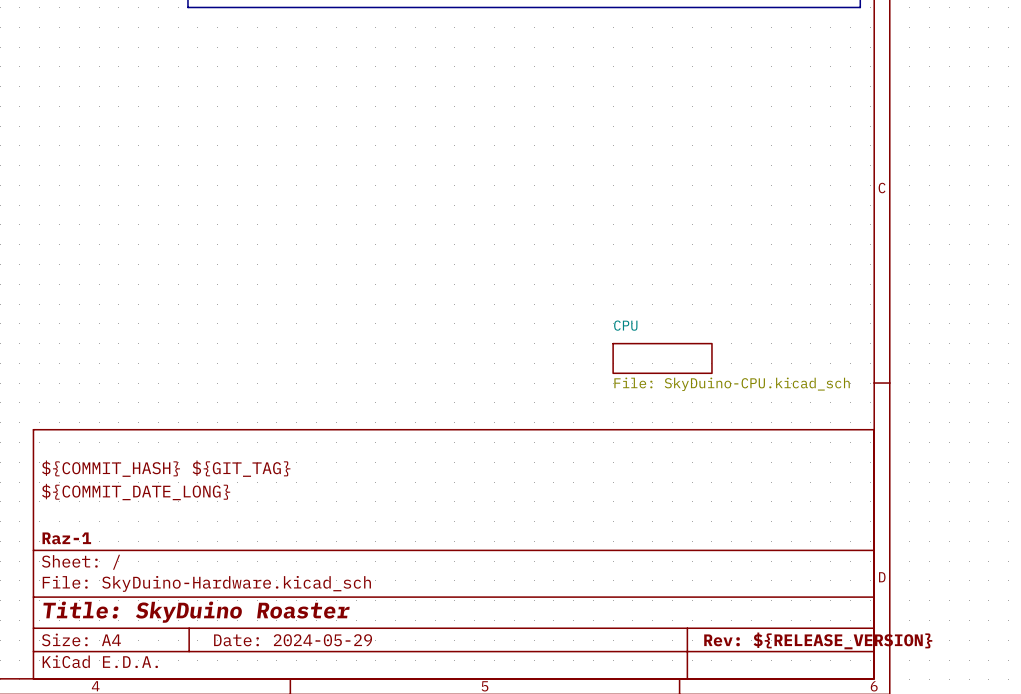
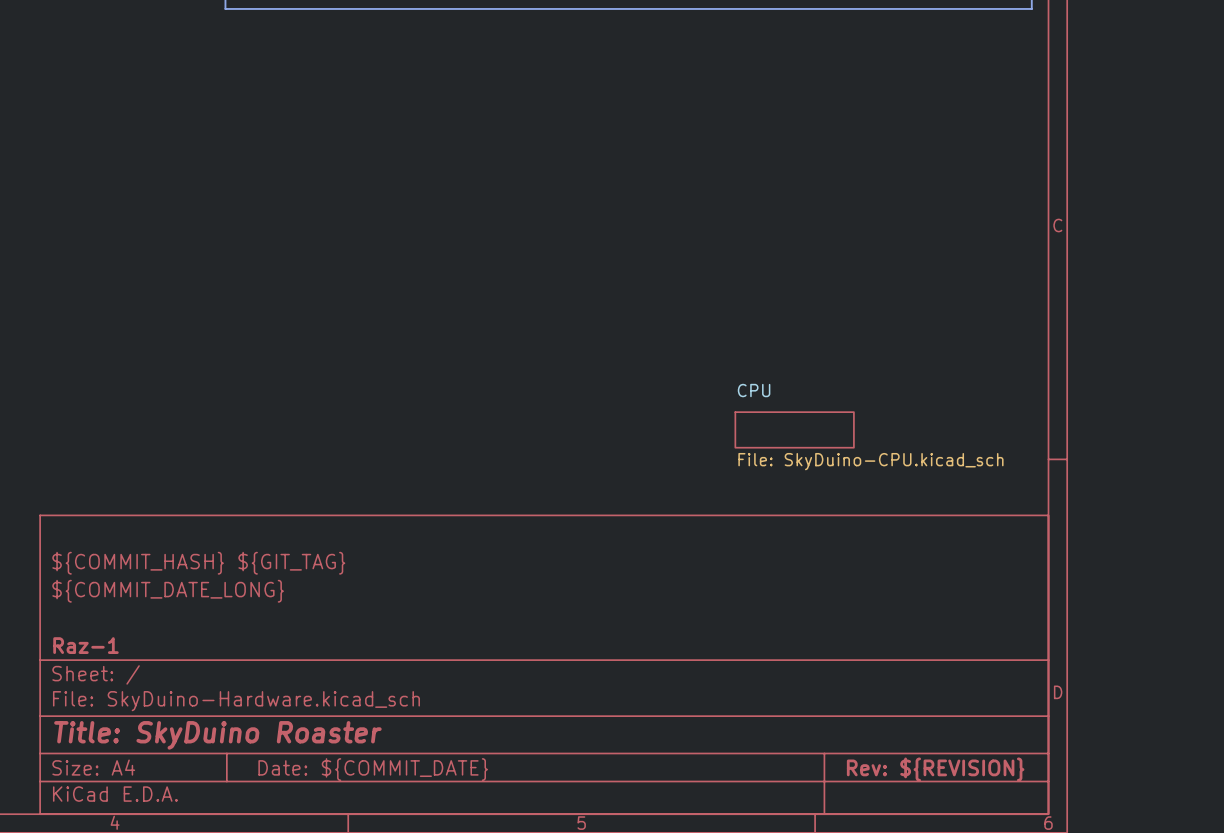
title block: Date: 2024-05-29 (293, 640) -> Date: ${COMMIT_DATE} (373, 769)
title block: Rev: ${RELEASE_VERSION} (818, 640) -> Rev: ${REVISION} (935, 769)

